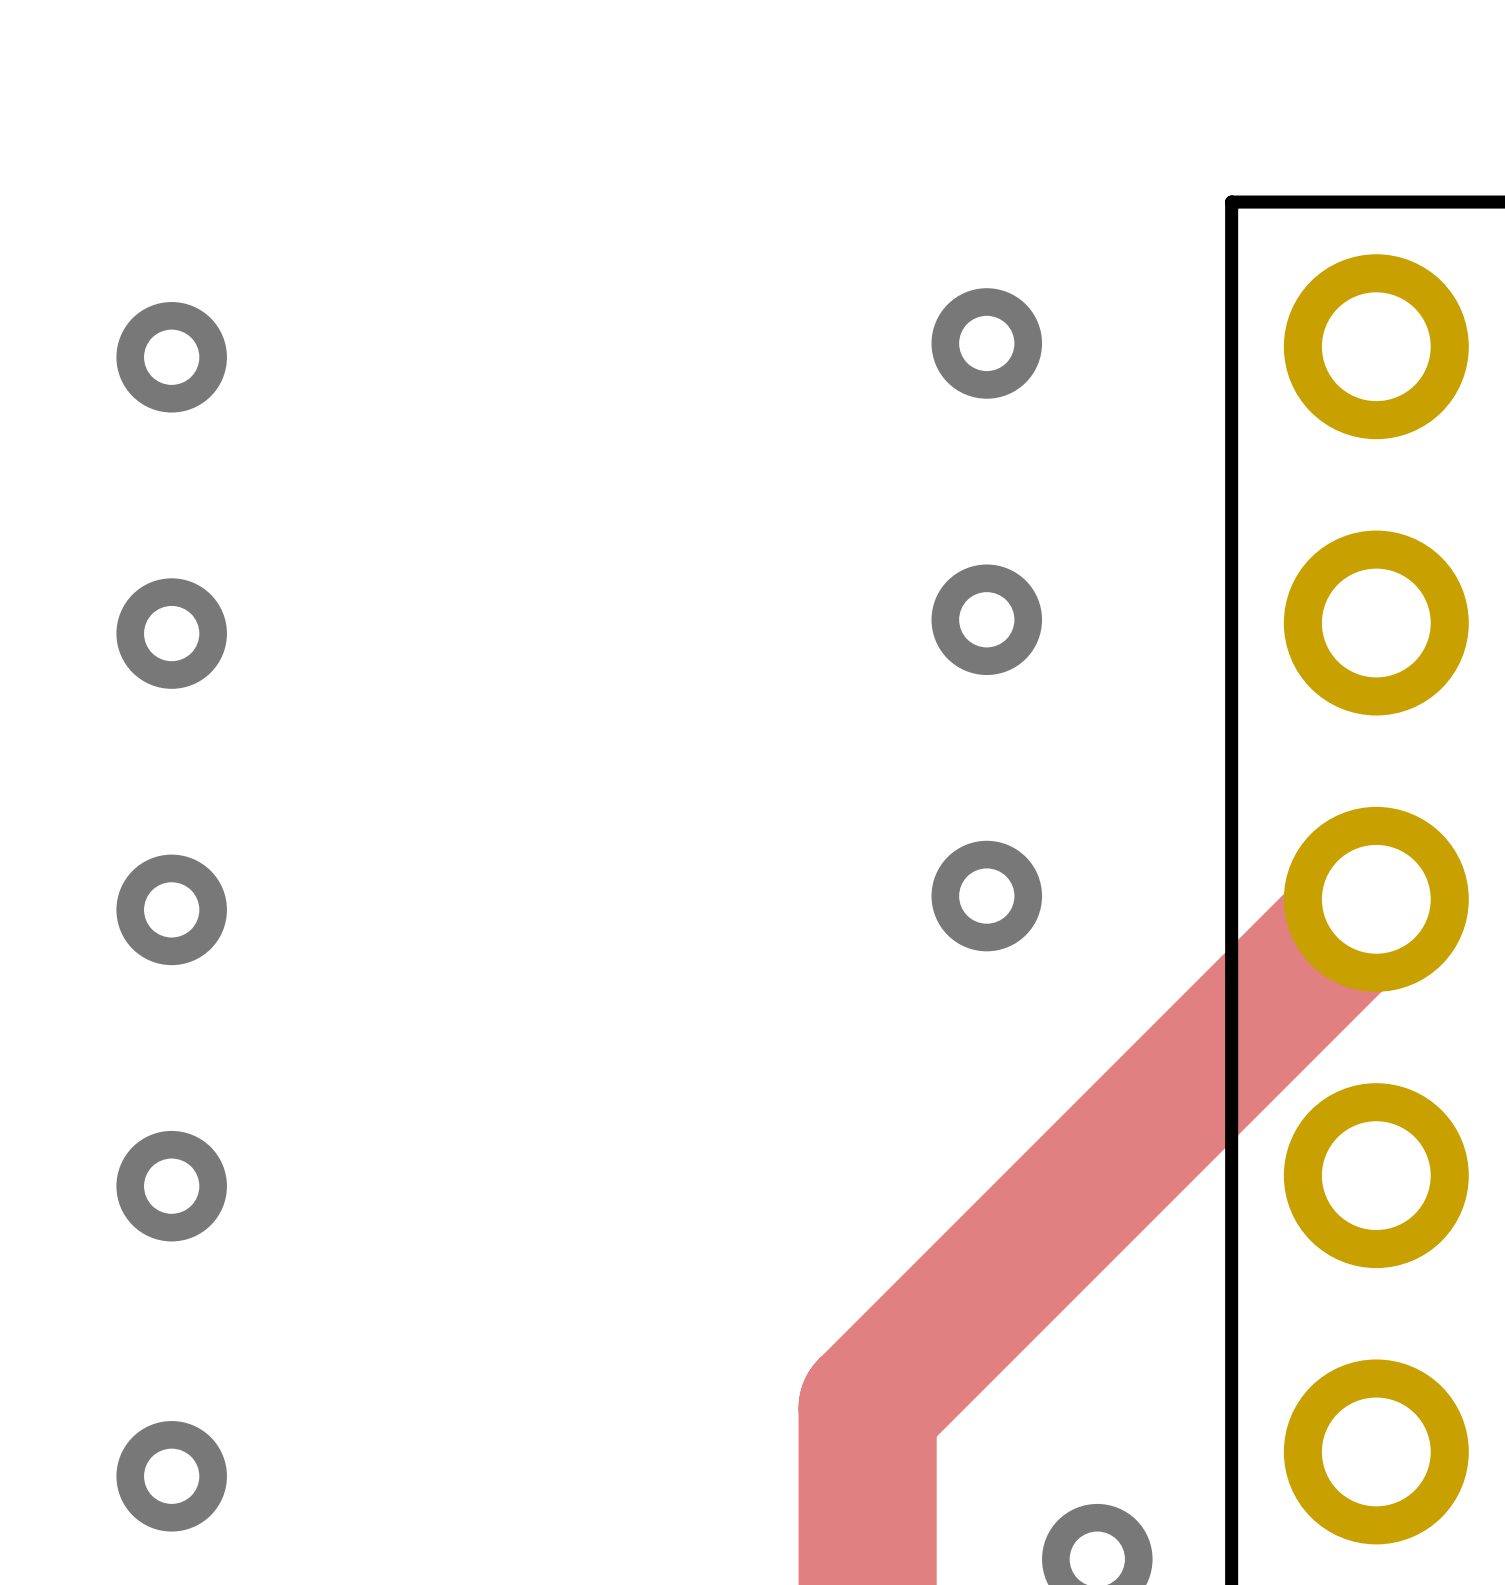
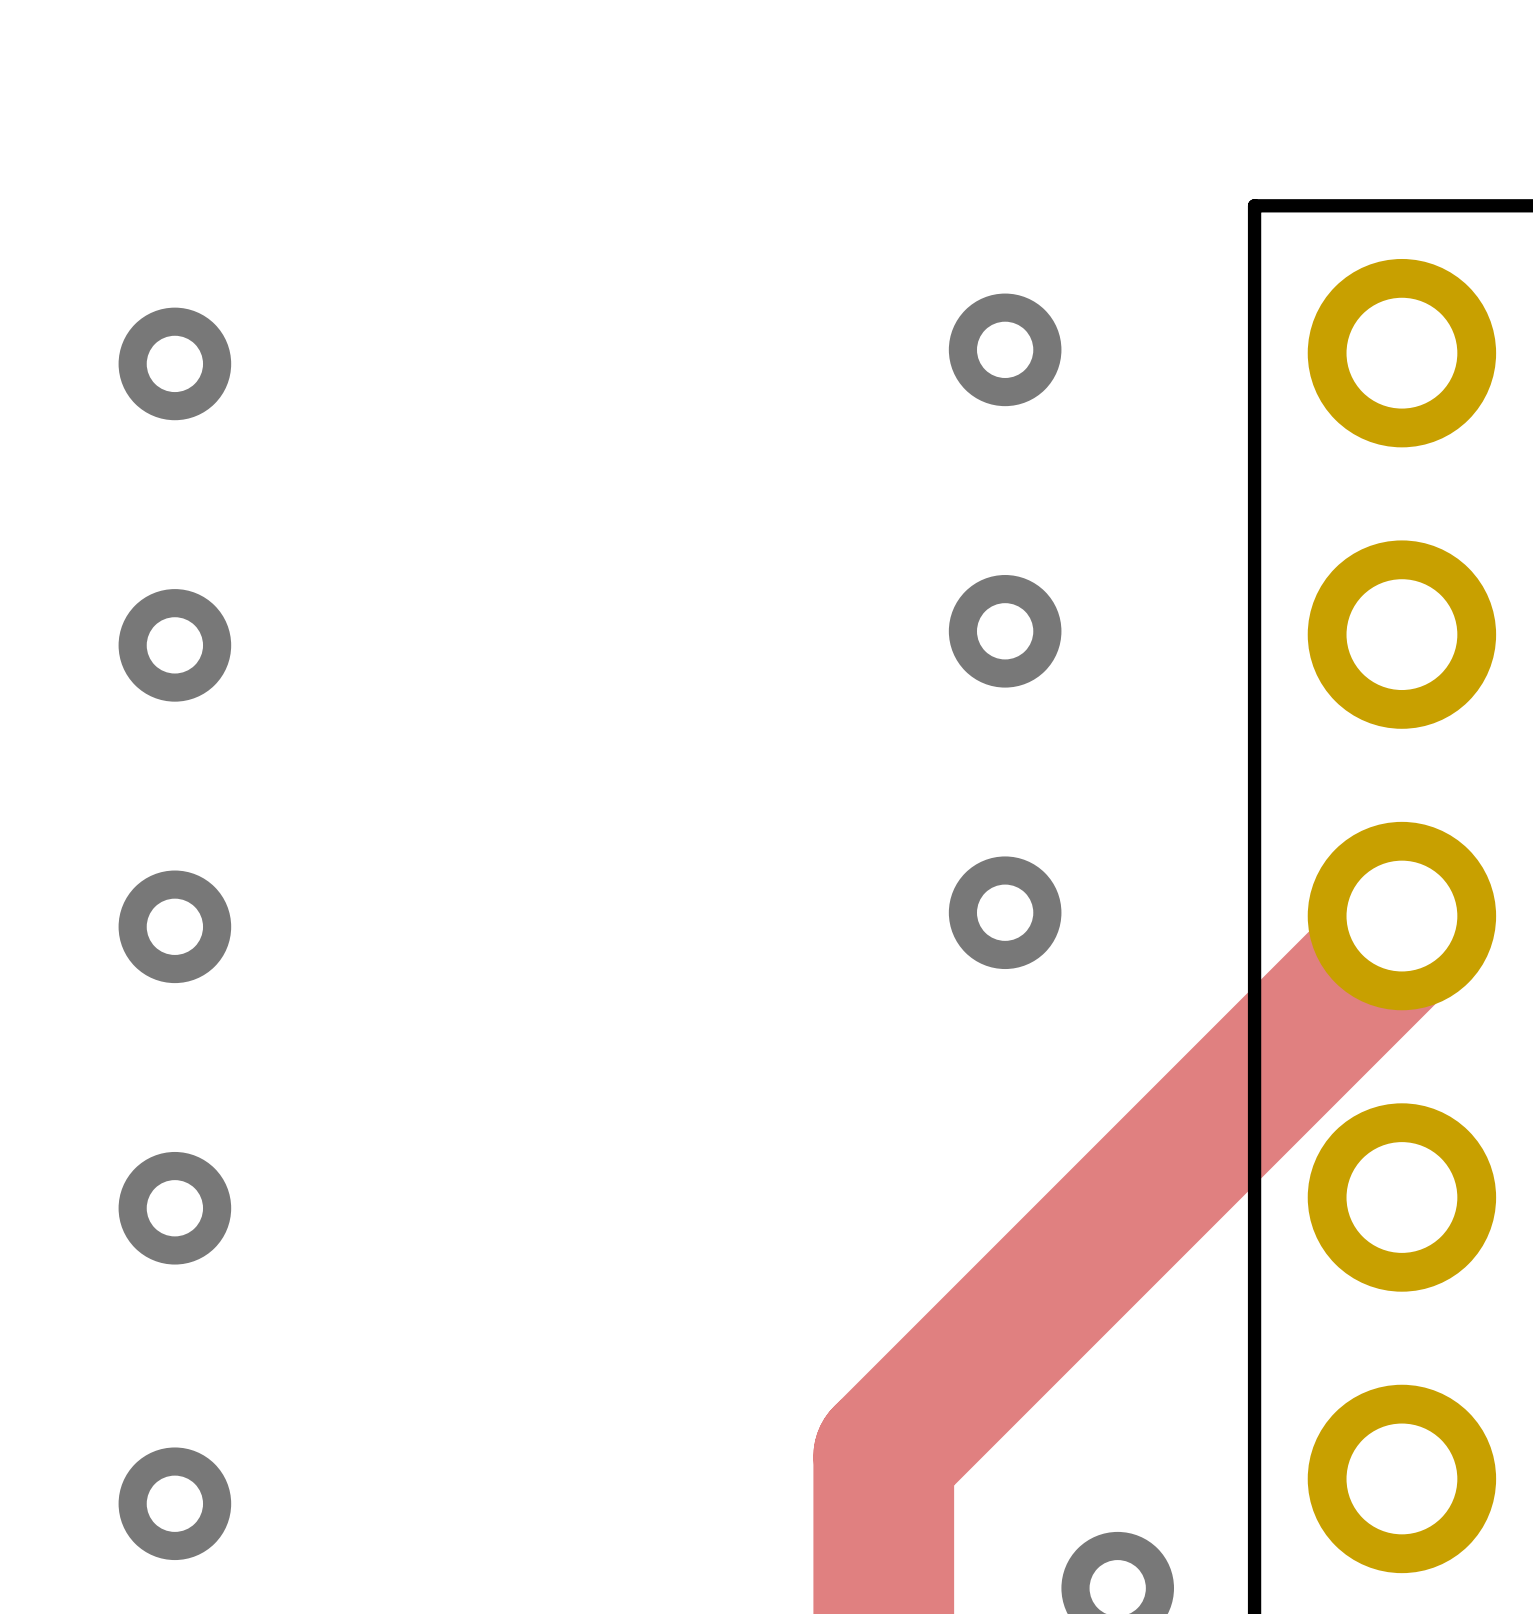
top track: (1376, 899) (867, 1408) (867, 1429) -> (1413, 926) (883, 1456)

